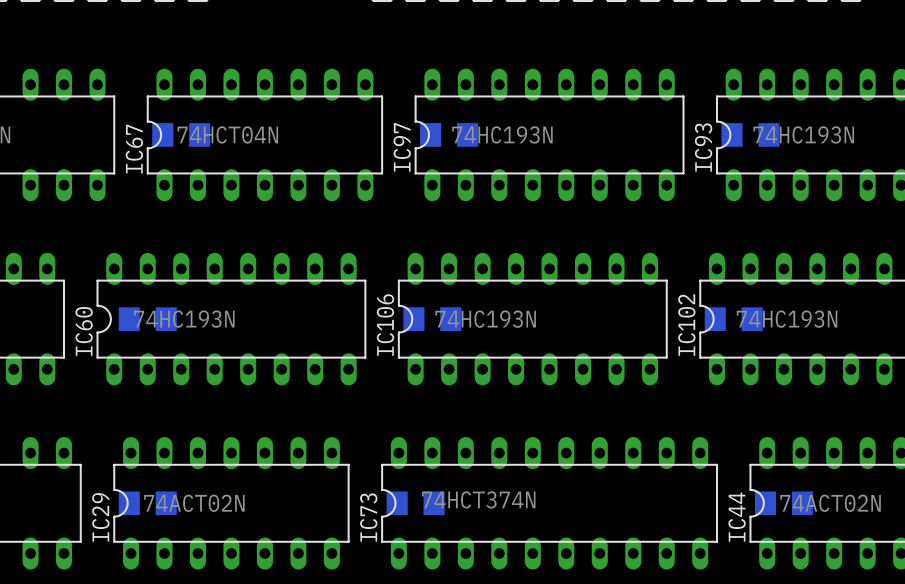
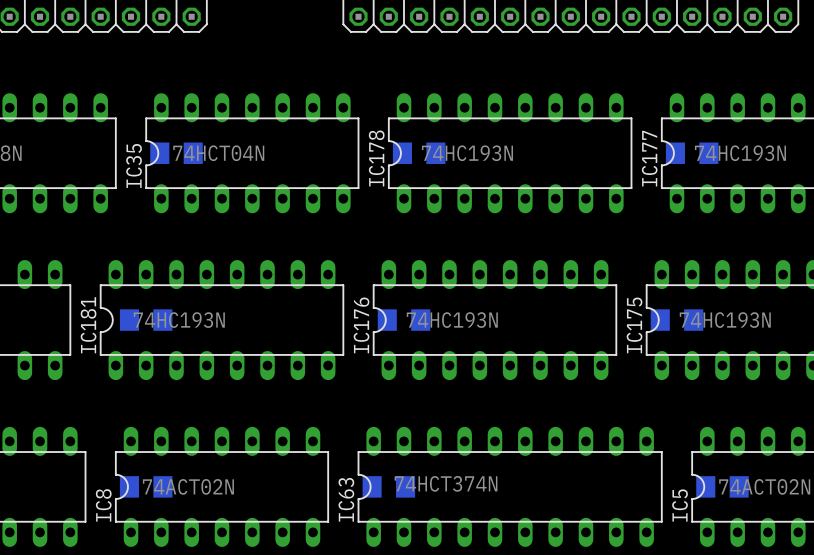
IC97 name: IC97 (402, 147) -> IC178 (376, 158)
IC93 name: IC93 (703, 147) -> IC177 (649, 158)
IC67 name: IC67 (134, 149) -> IC35 (134, 166)
IC106 name: IC106 (385, 325) -> IC176 (361, 325)
IC102 name: IC102 (686, 325) -> IC175 (634, 325)
IC60 name: IC60 (84, 331) -> IC181 (88, 325)
IC29 name: IC29 (100, 517) -> IC8 (103, 505)
IC73 name: IC73 (368, 517) -> IC63 (346, 499)
IC44 name: IC44 (737, 517) -> IC5 (680, 505)

